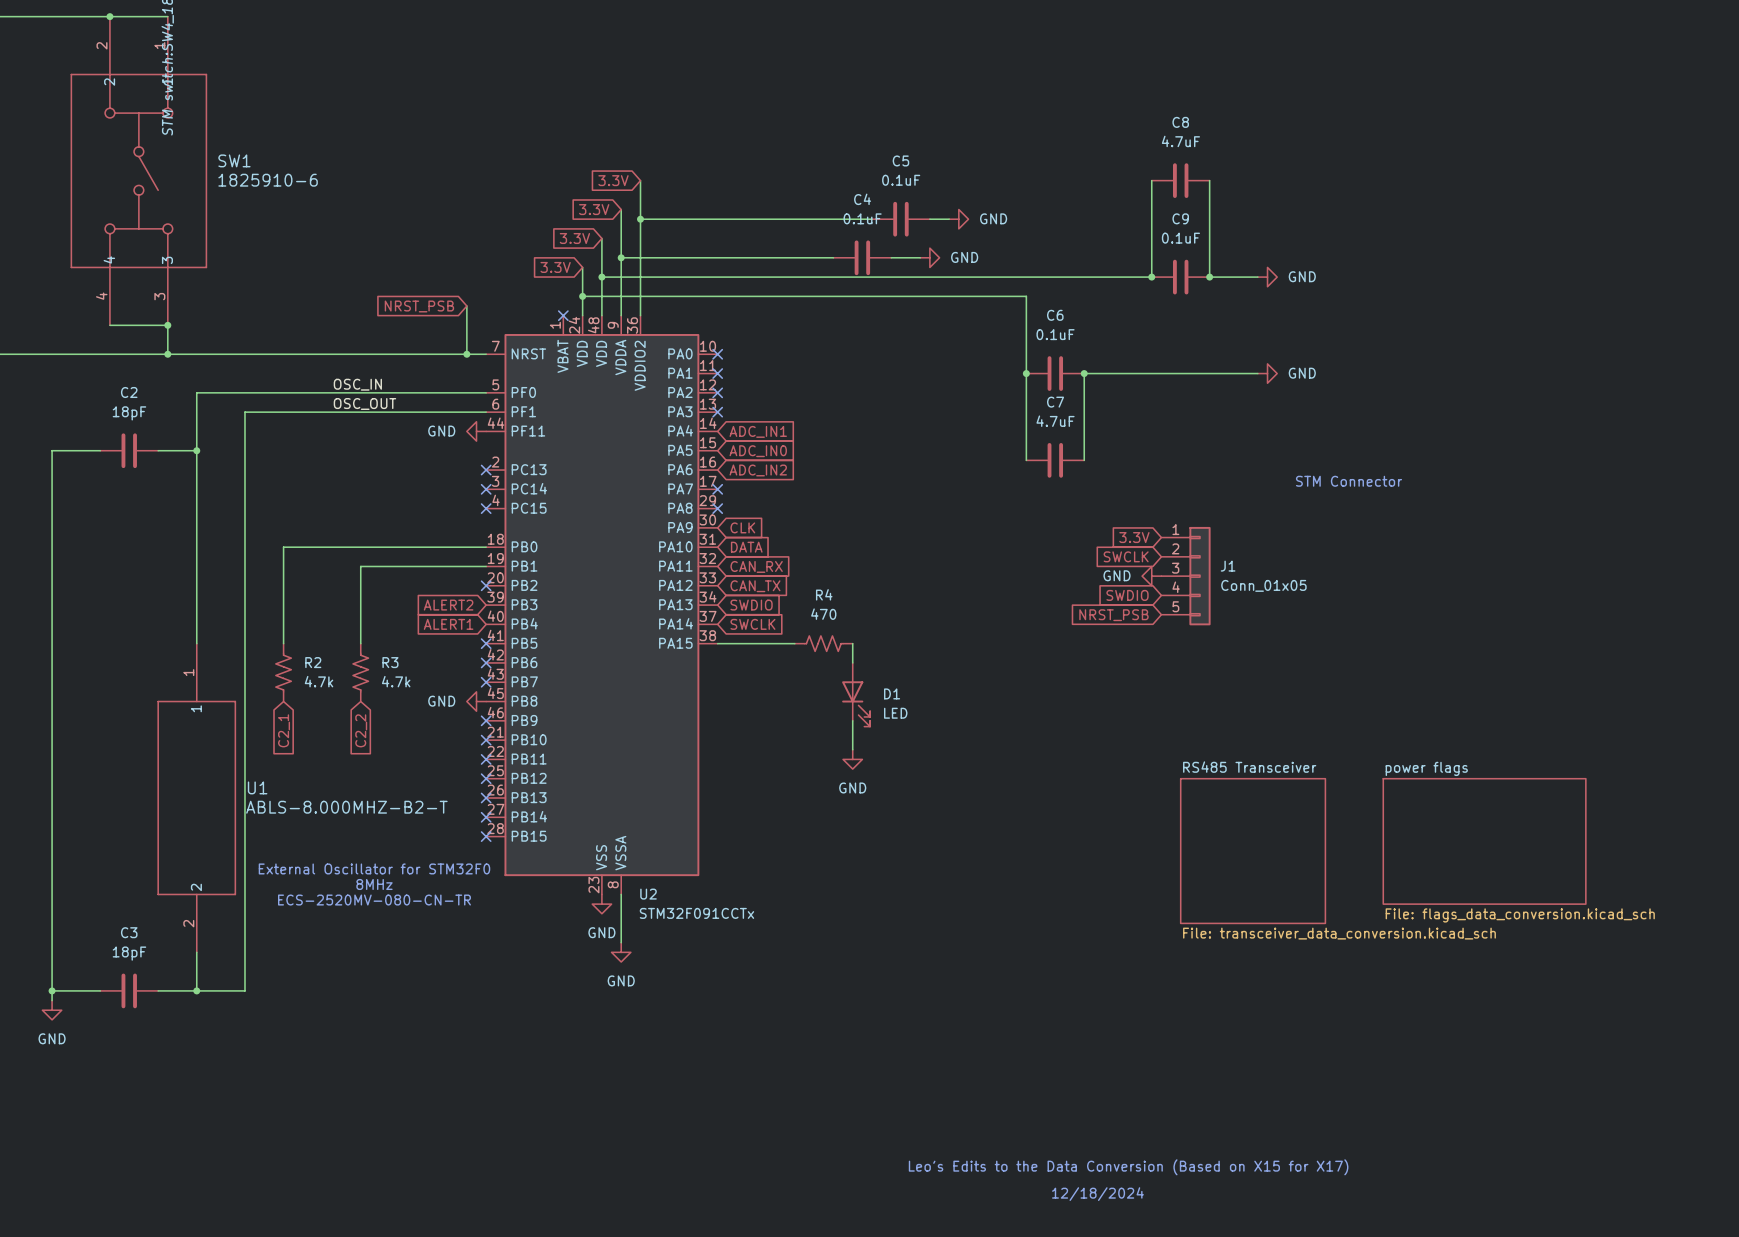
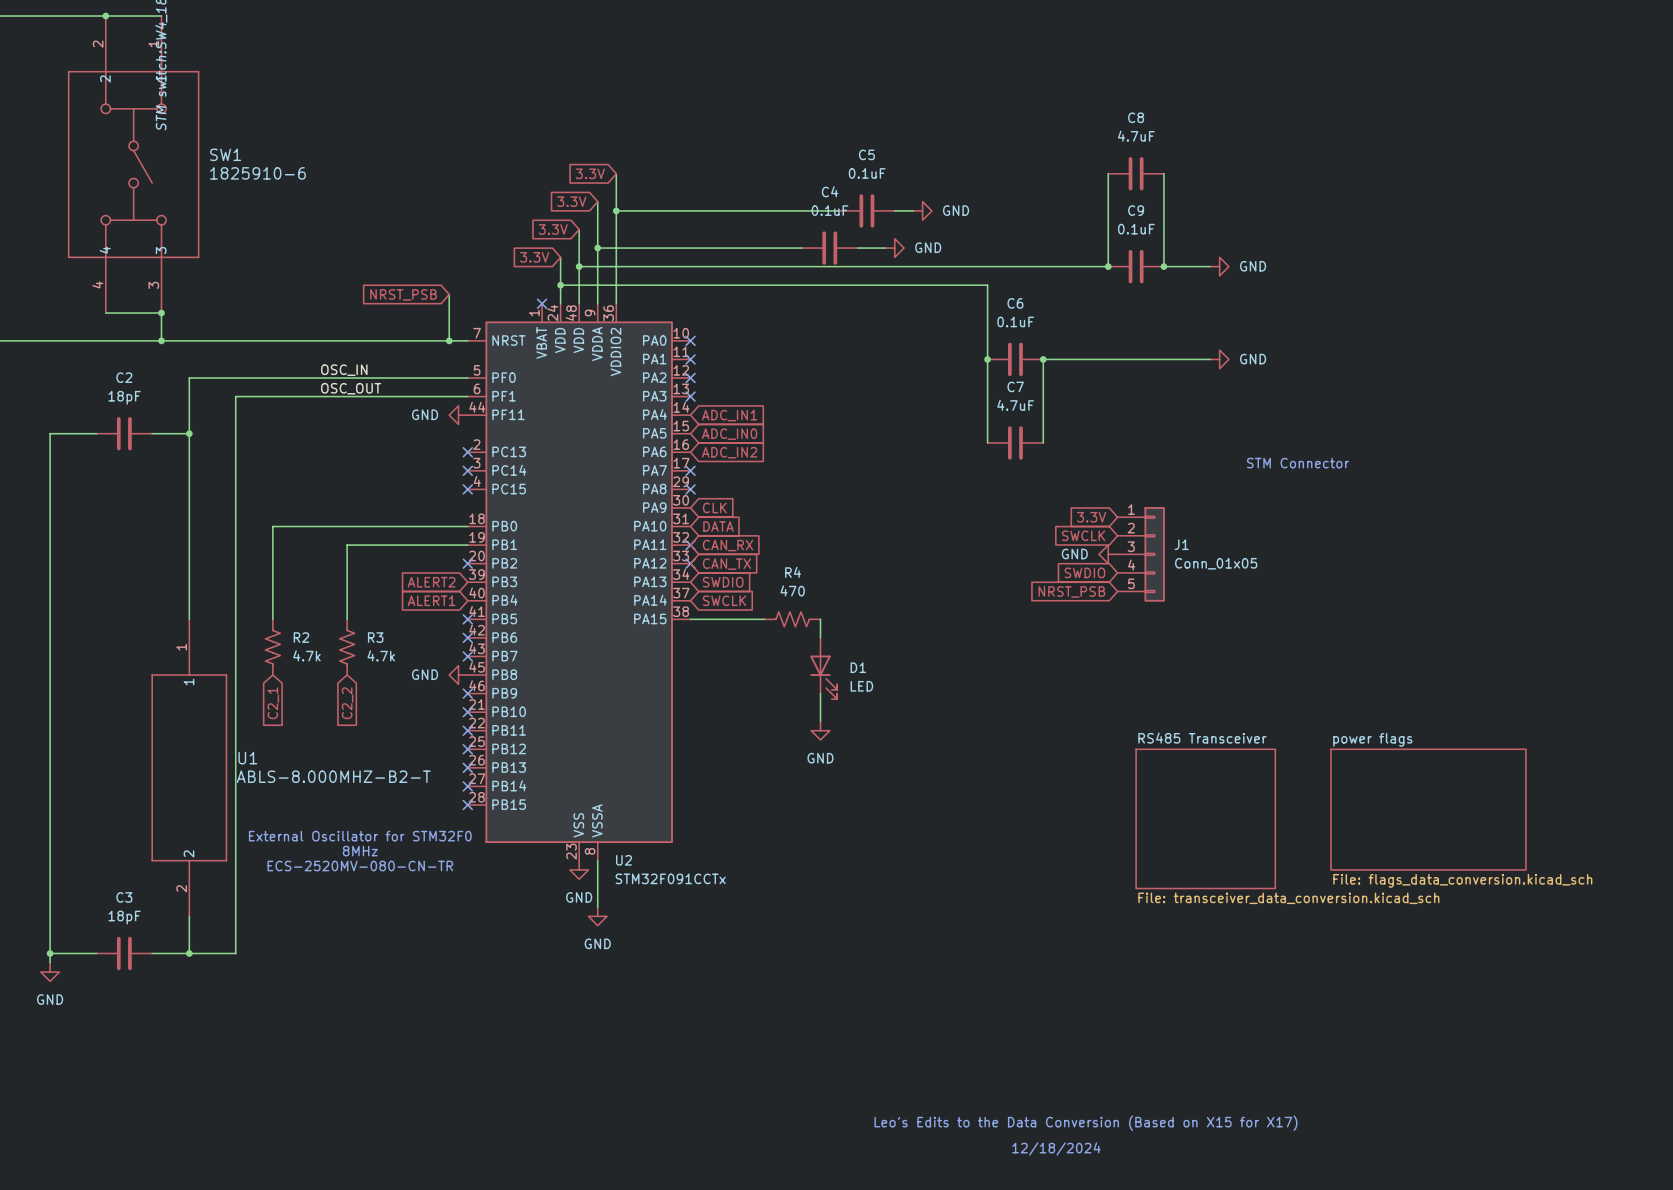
no-connect mark: none -> (690, 545)
no-connect mark: none -> (690, 563)

